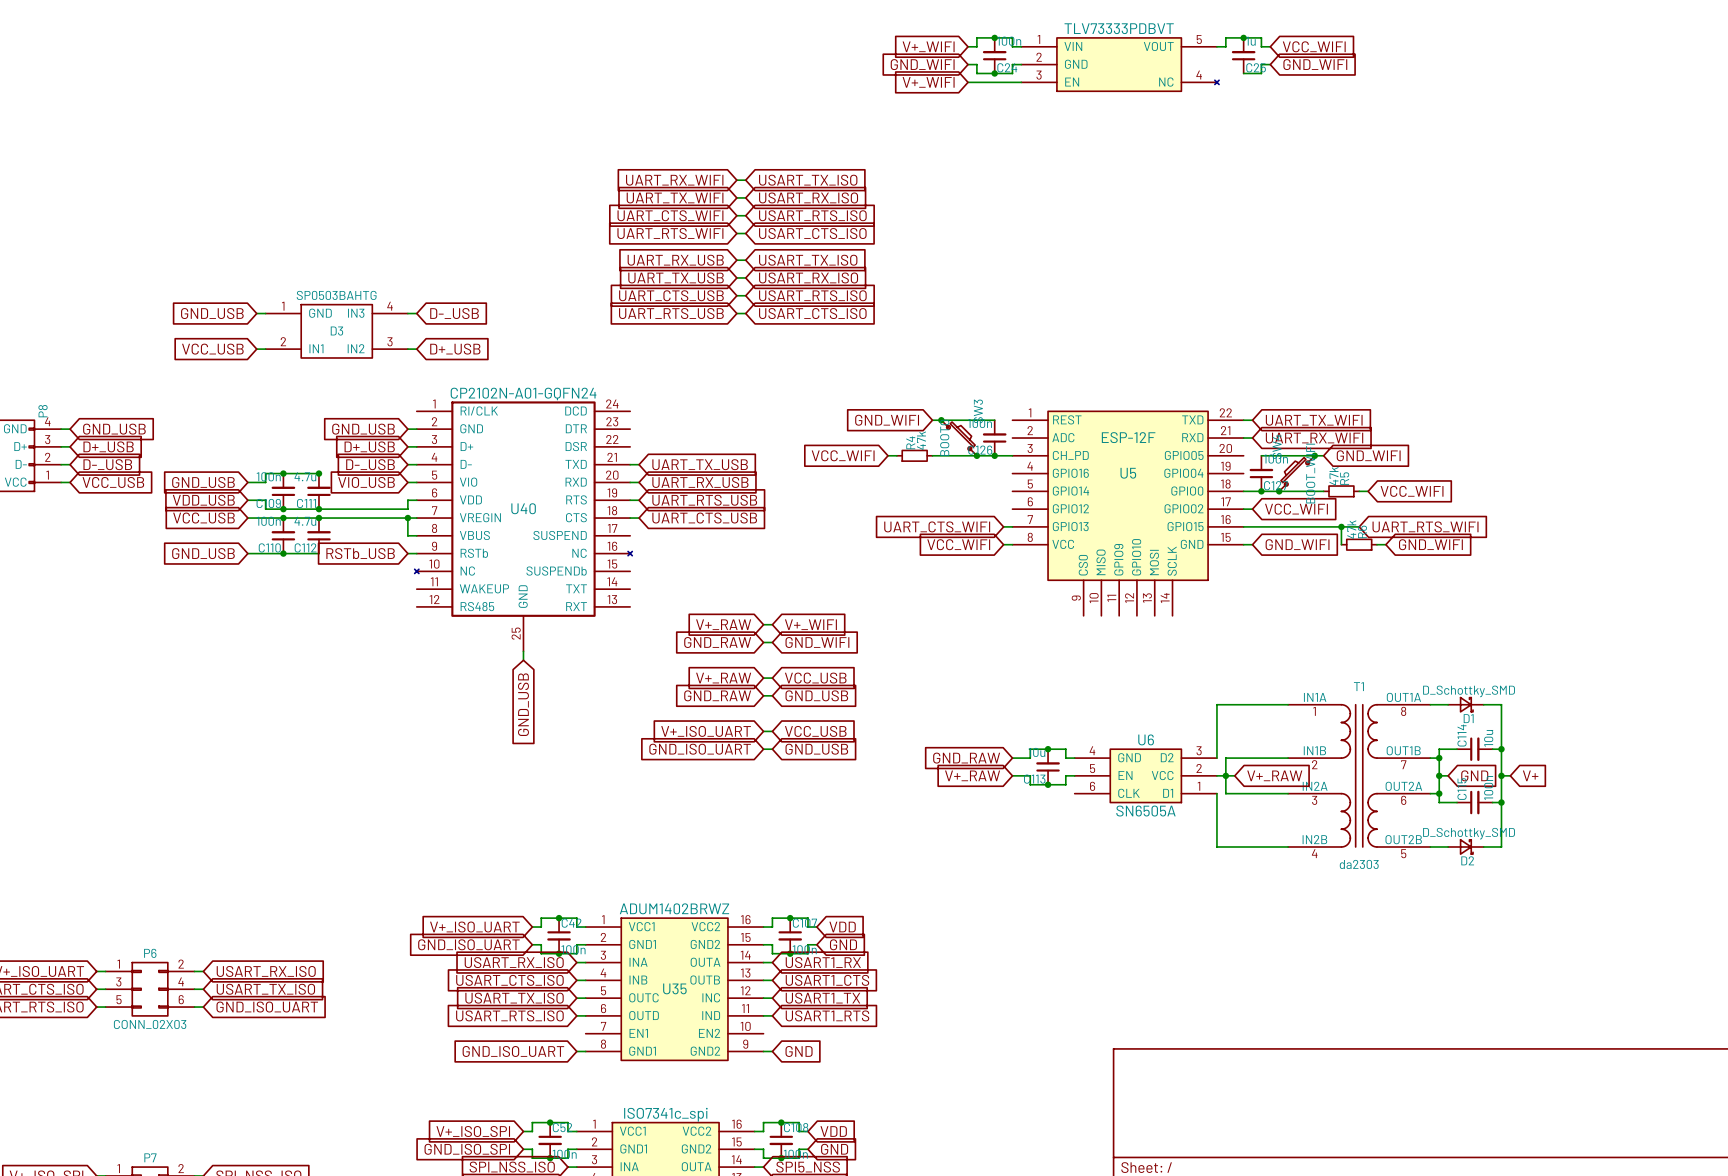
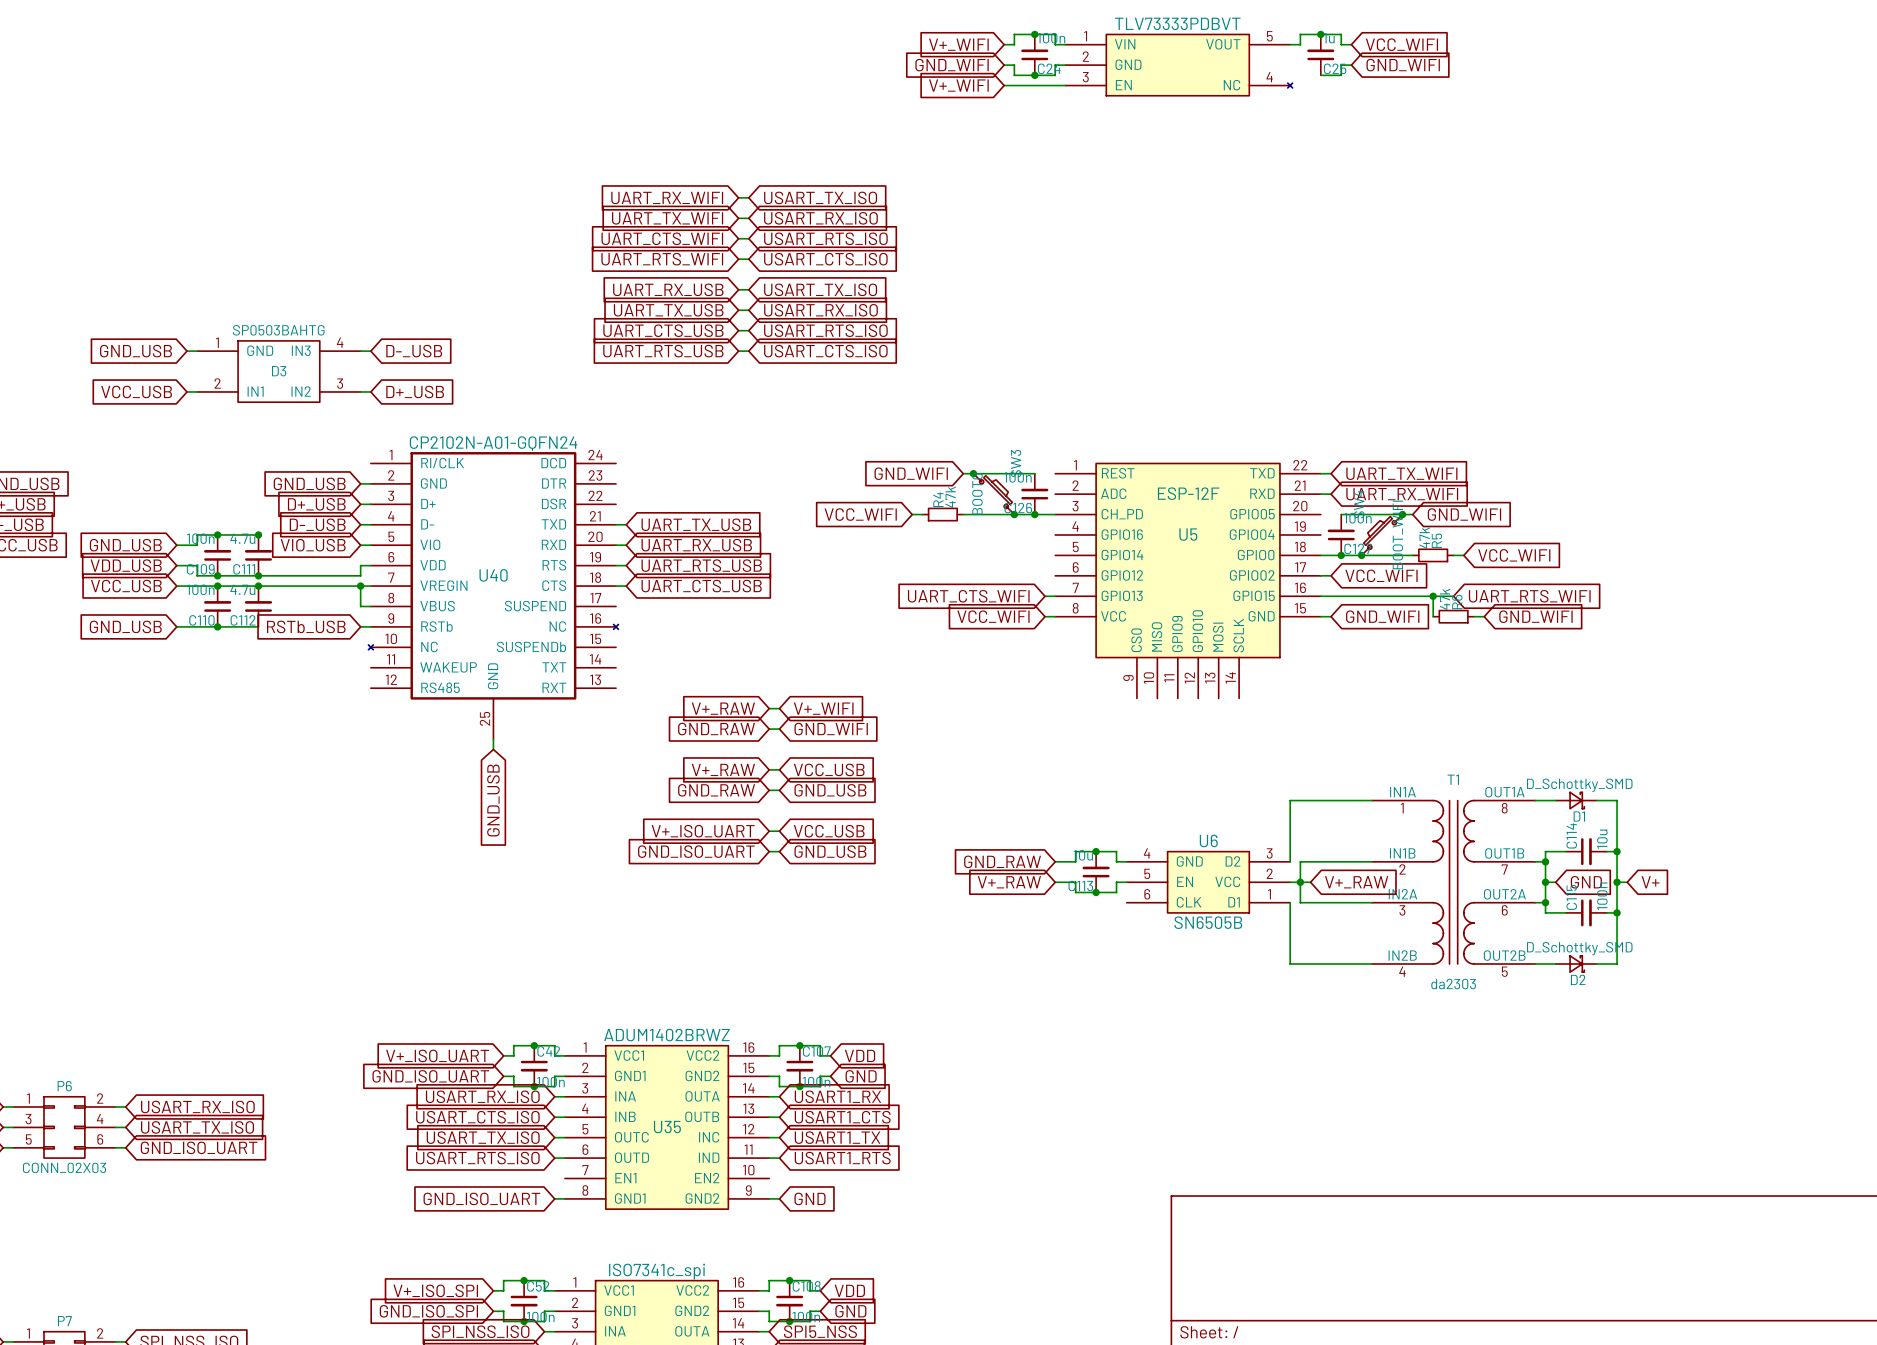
U6 value: SN6505A (1145, 811) -> SN6505B (1208, 922)

